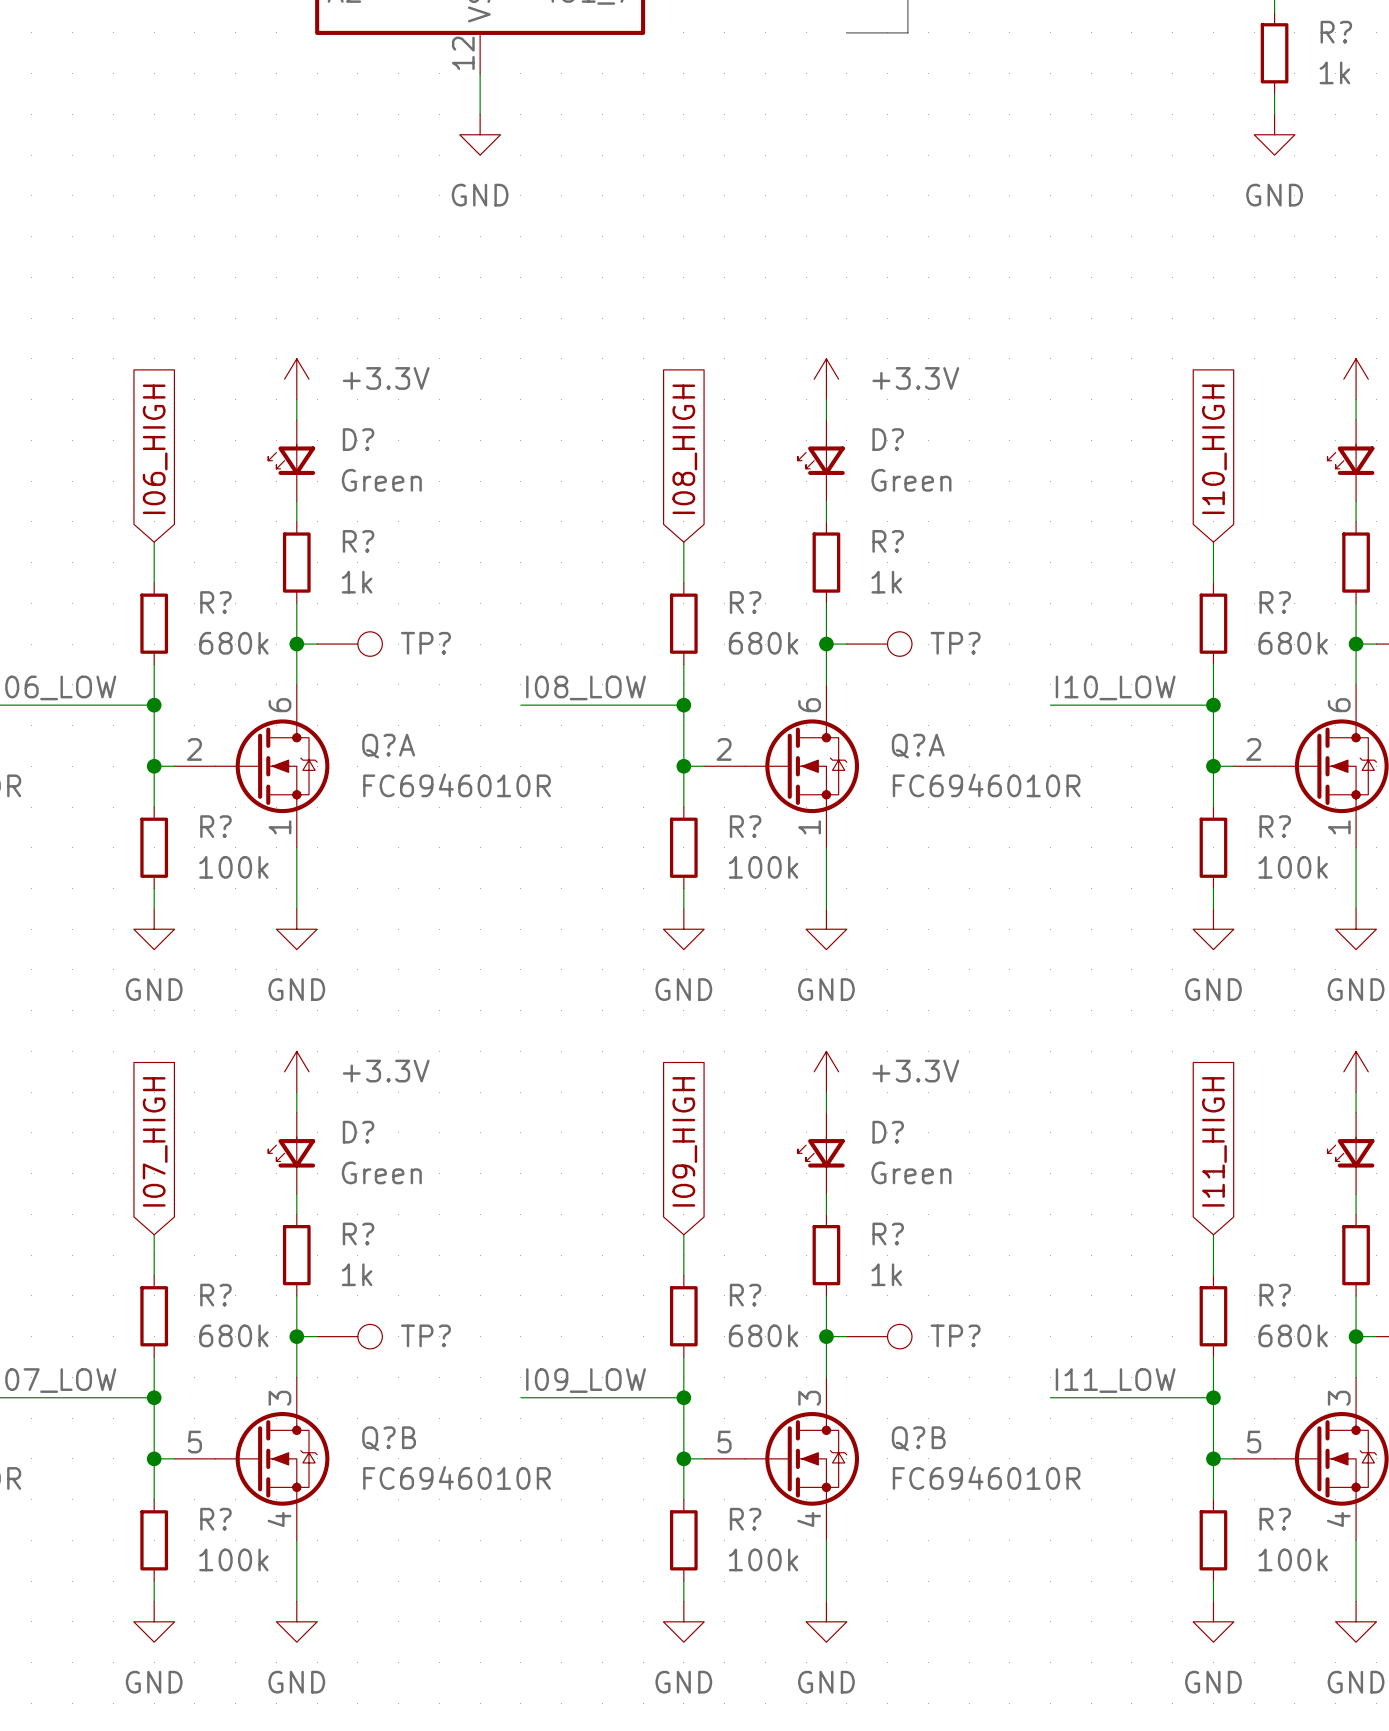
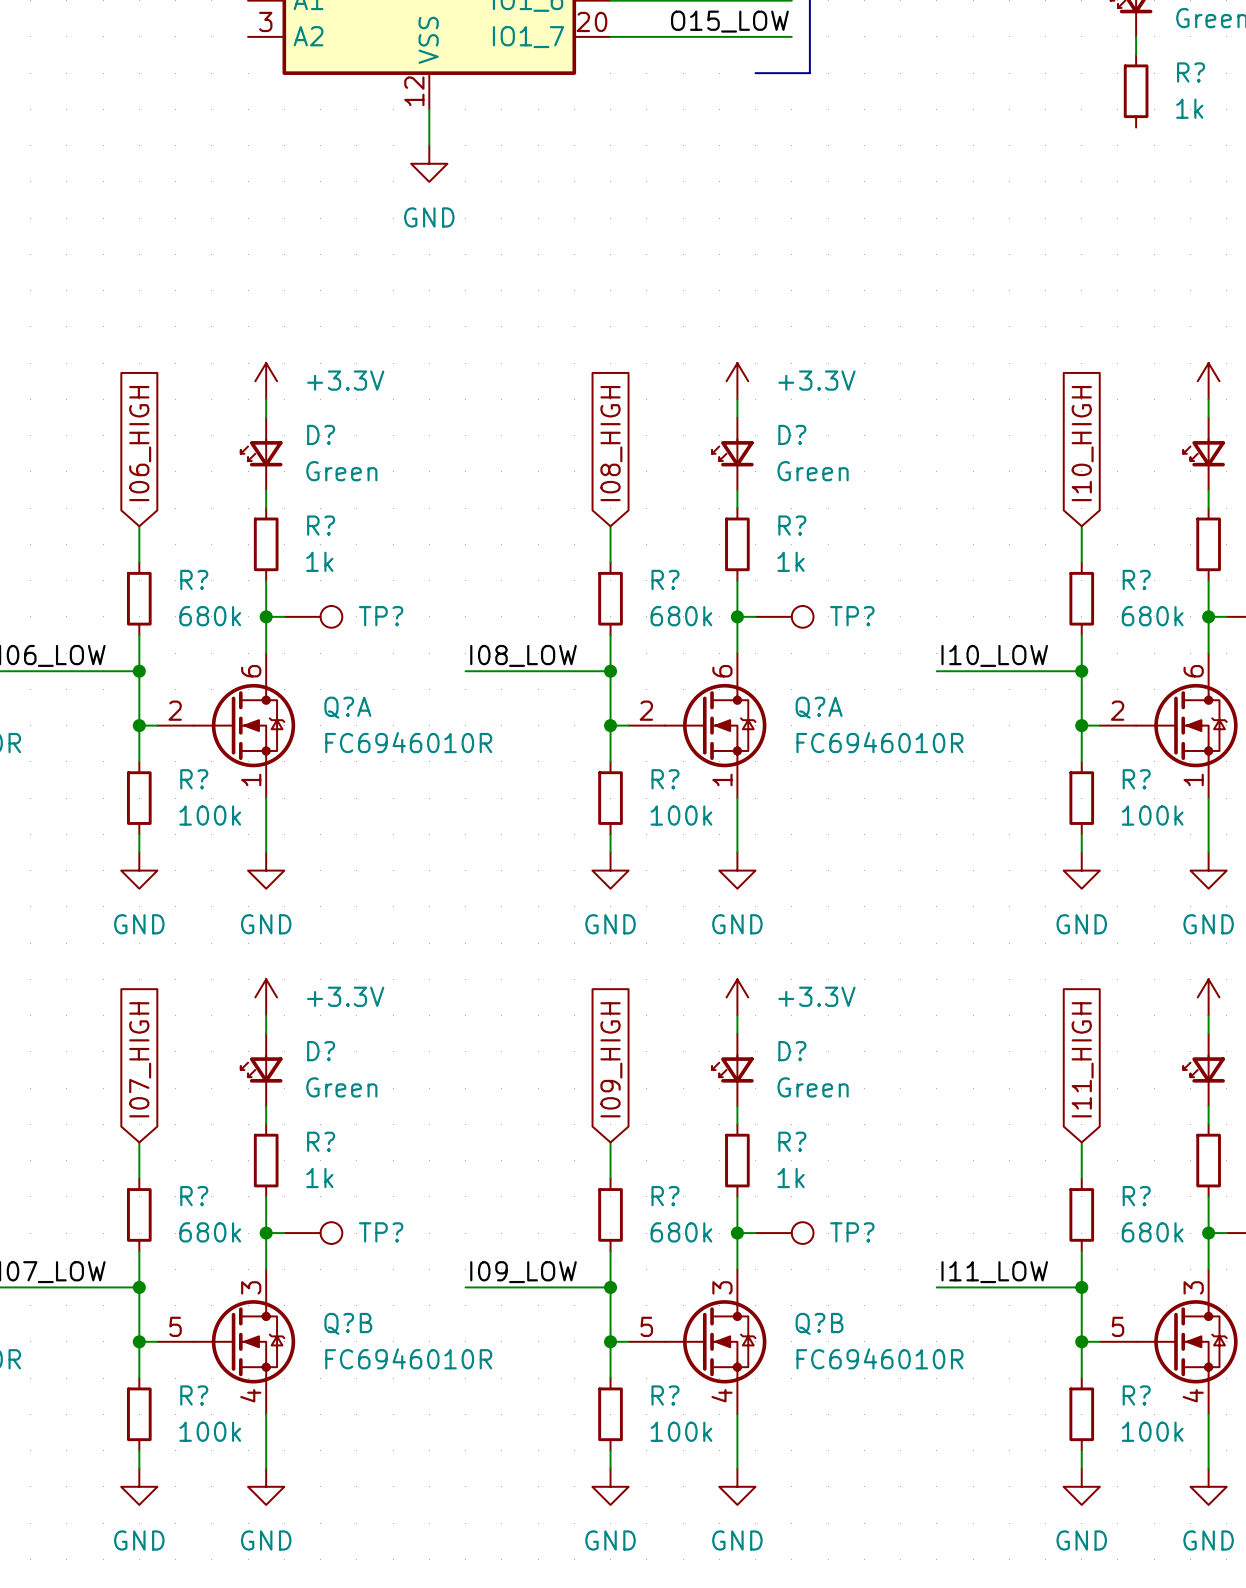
wire: (1274, 94) (1274, 114) -> none
power symbol: GND (1274, 134) -> none

